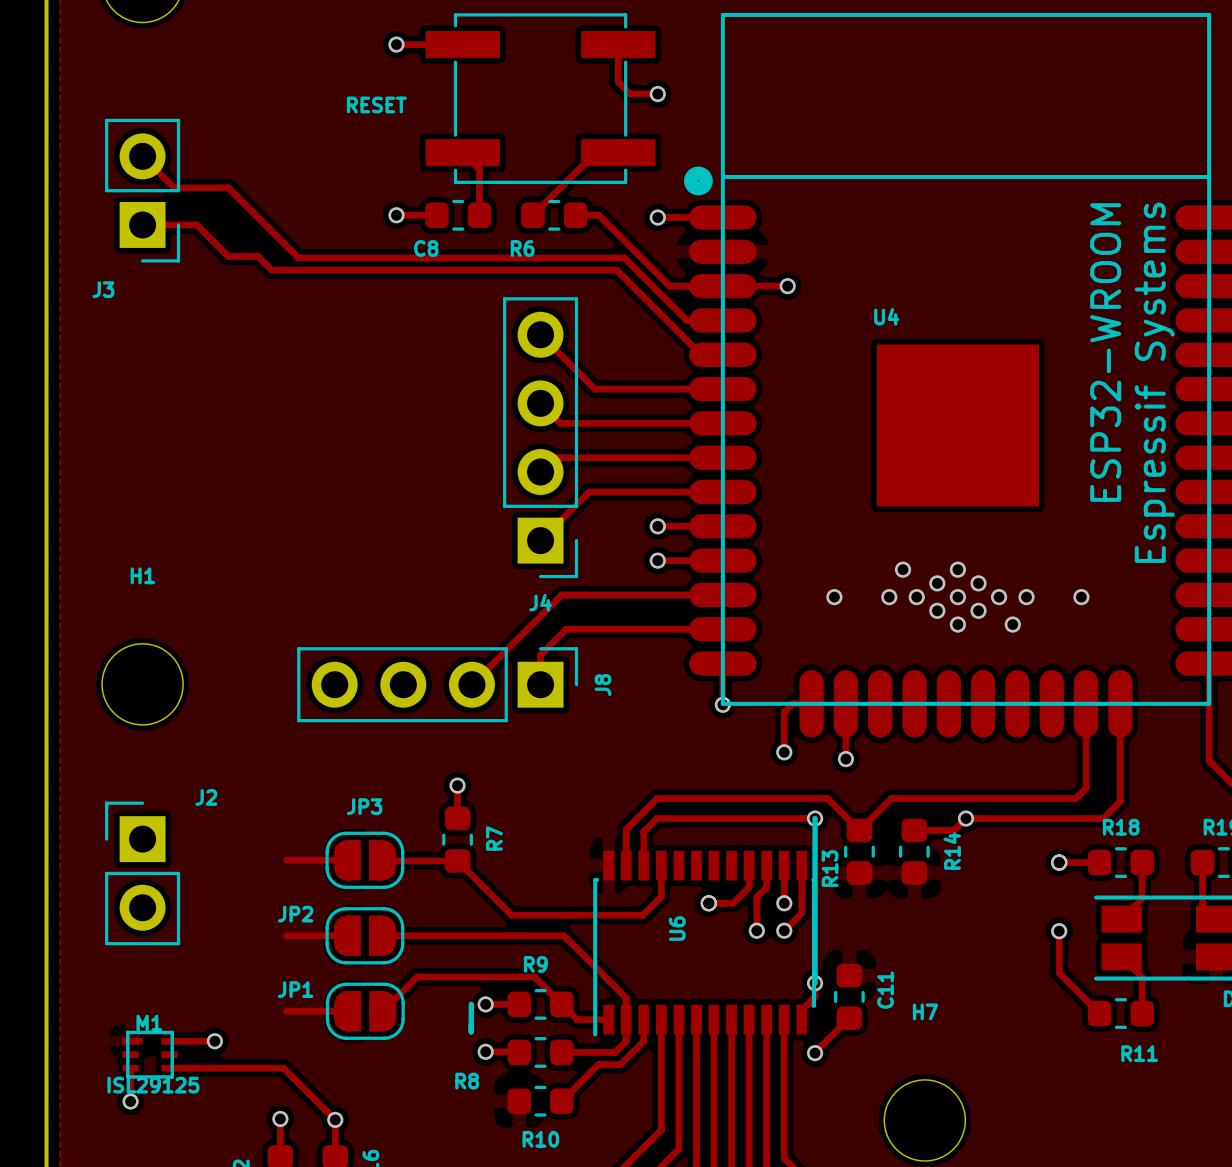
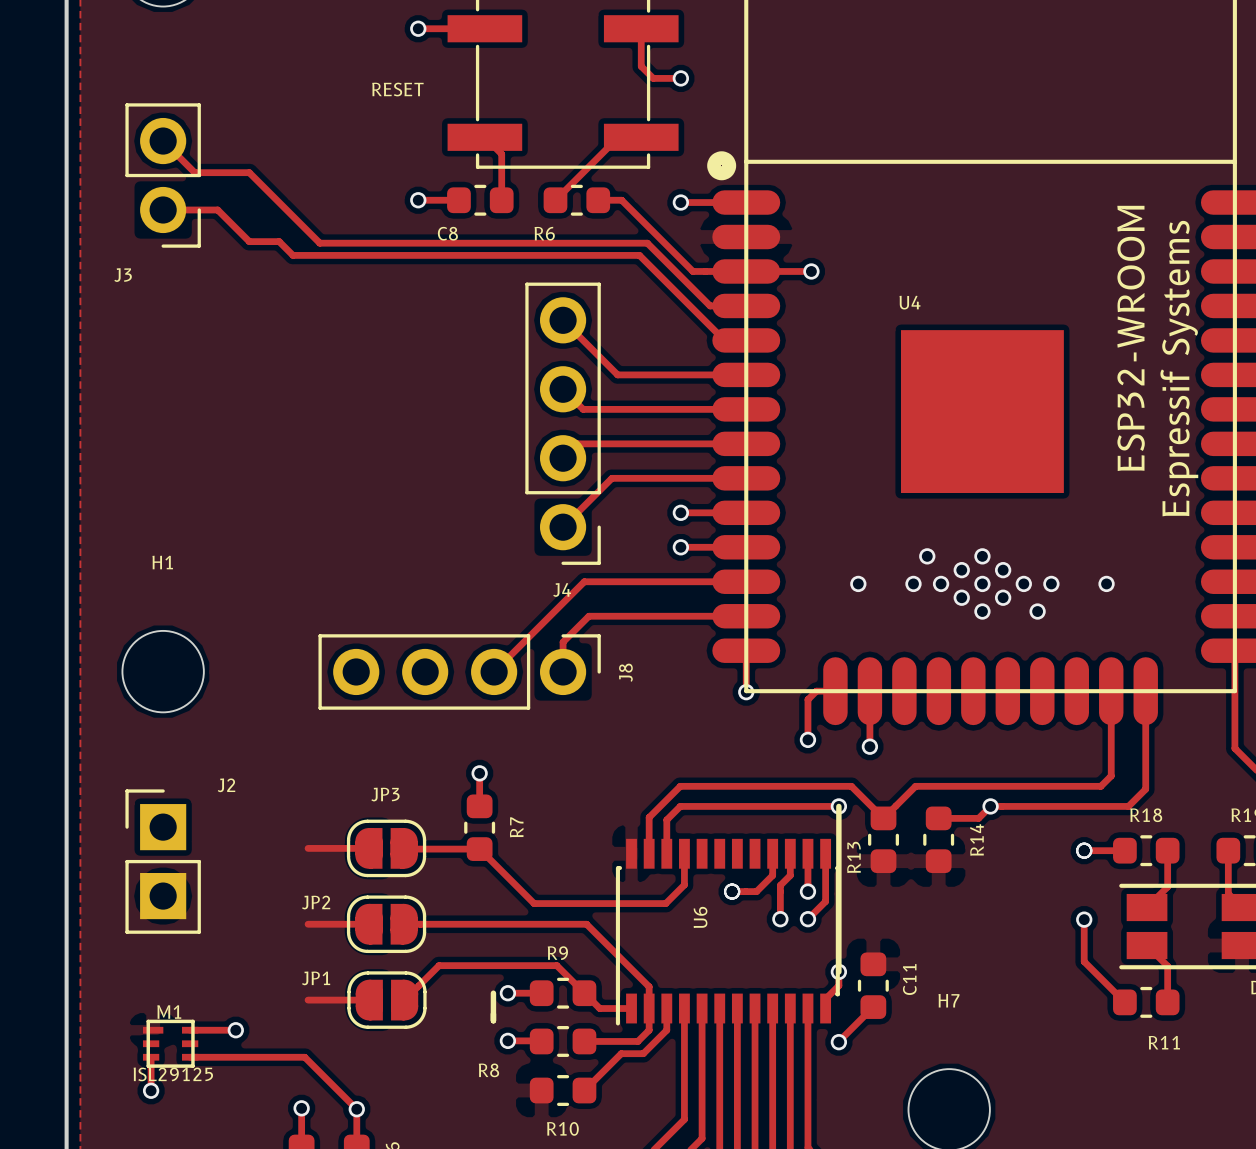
J3 footprint: [105, 118, 181, 263] -> [125, 103, 201, 248]
J4 footprint: [503, 297, 579, 579] -> [525, 282, 601, 565]
J8 footprint: [297, 647, 579, 723] -> [318, 634, 601, 710]
J2 footprint: [105, 801, 181, 946] -> [125, 789, 201, 934]

